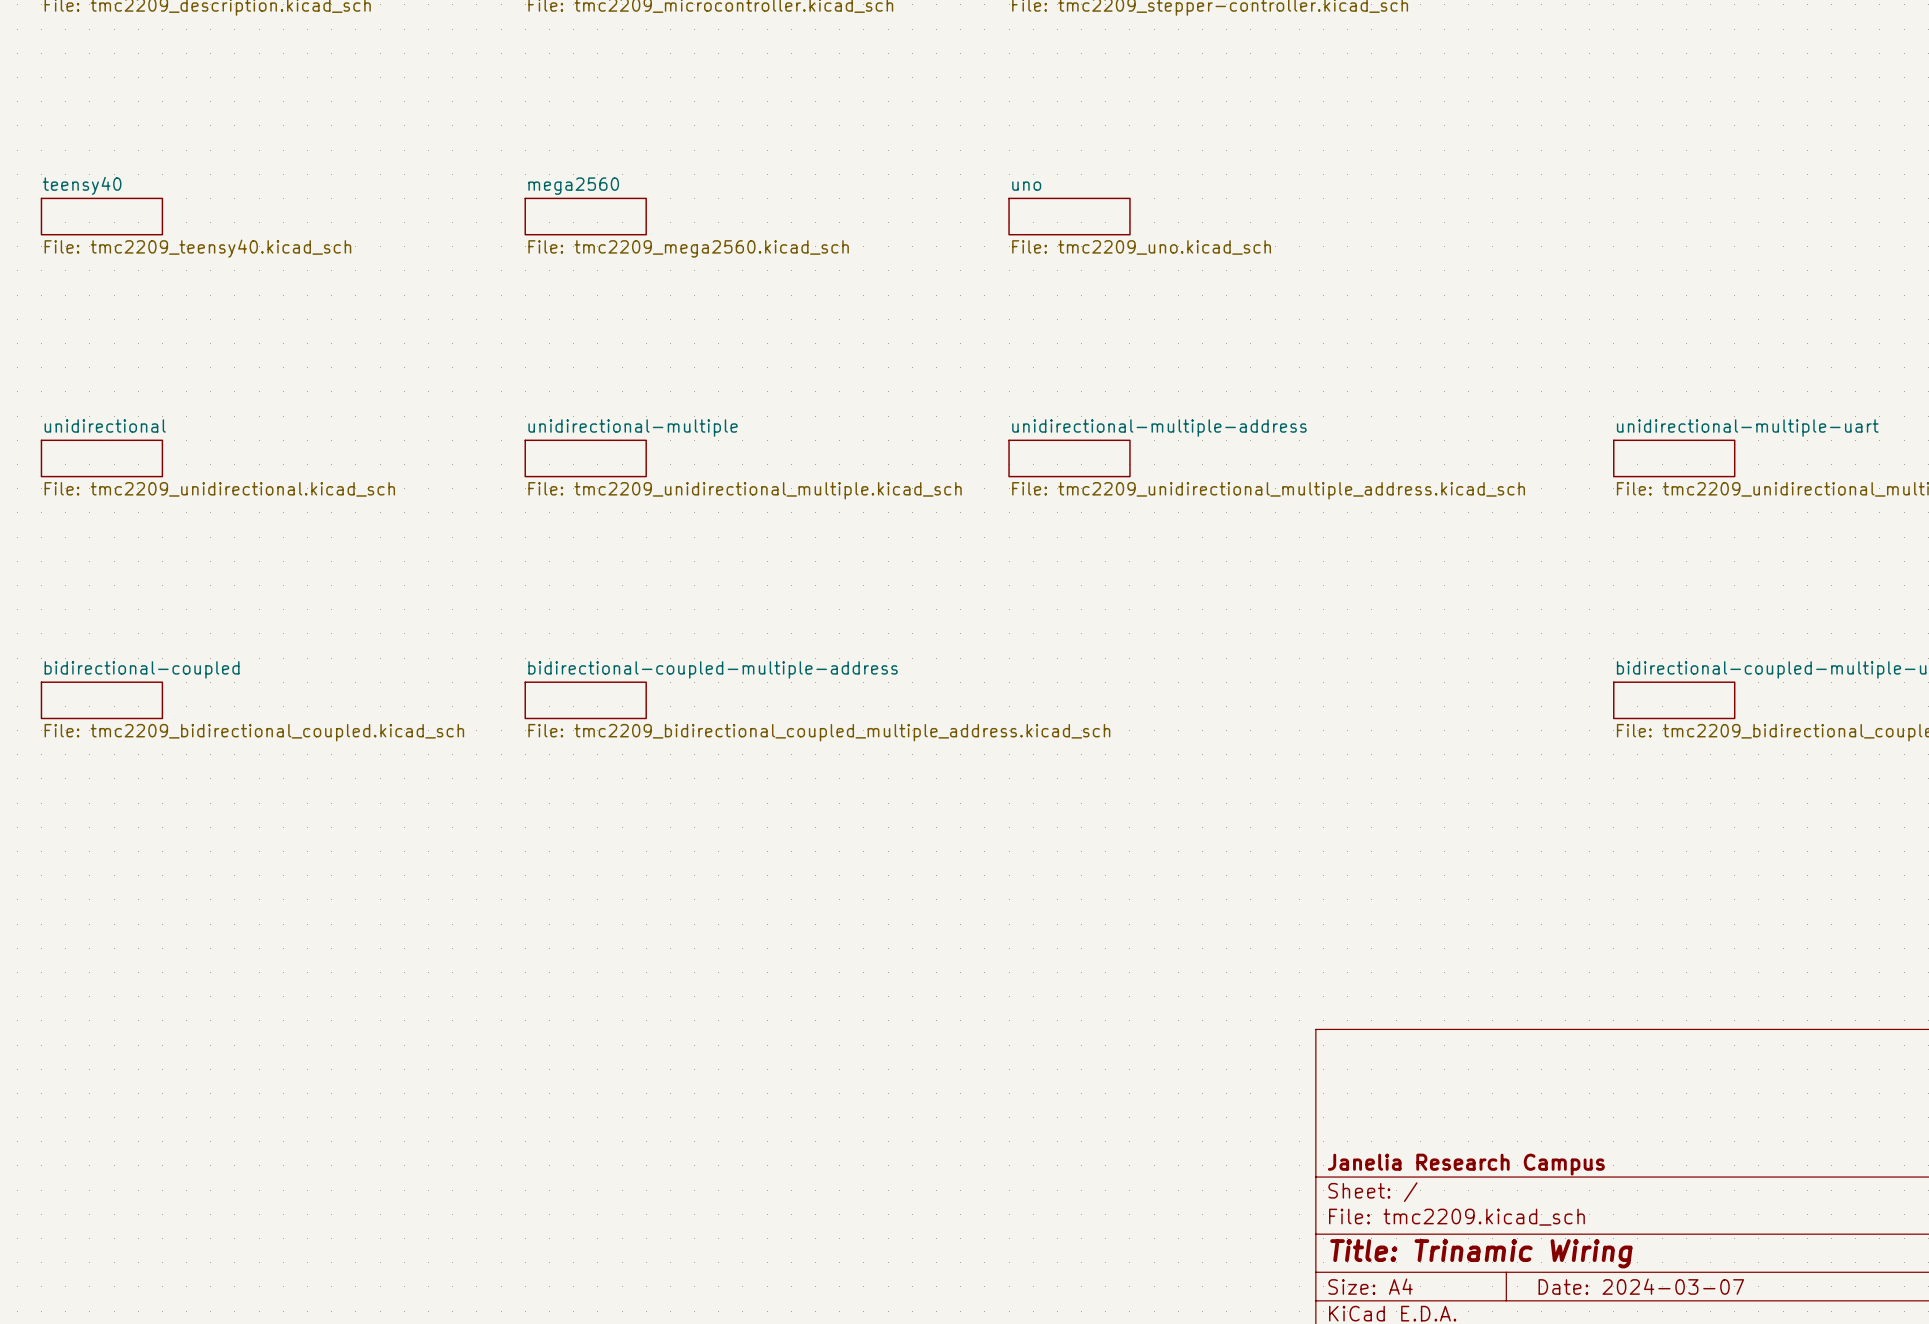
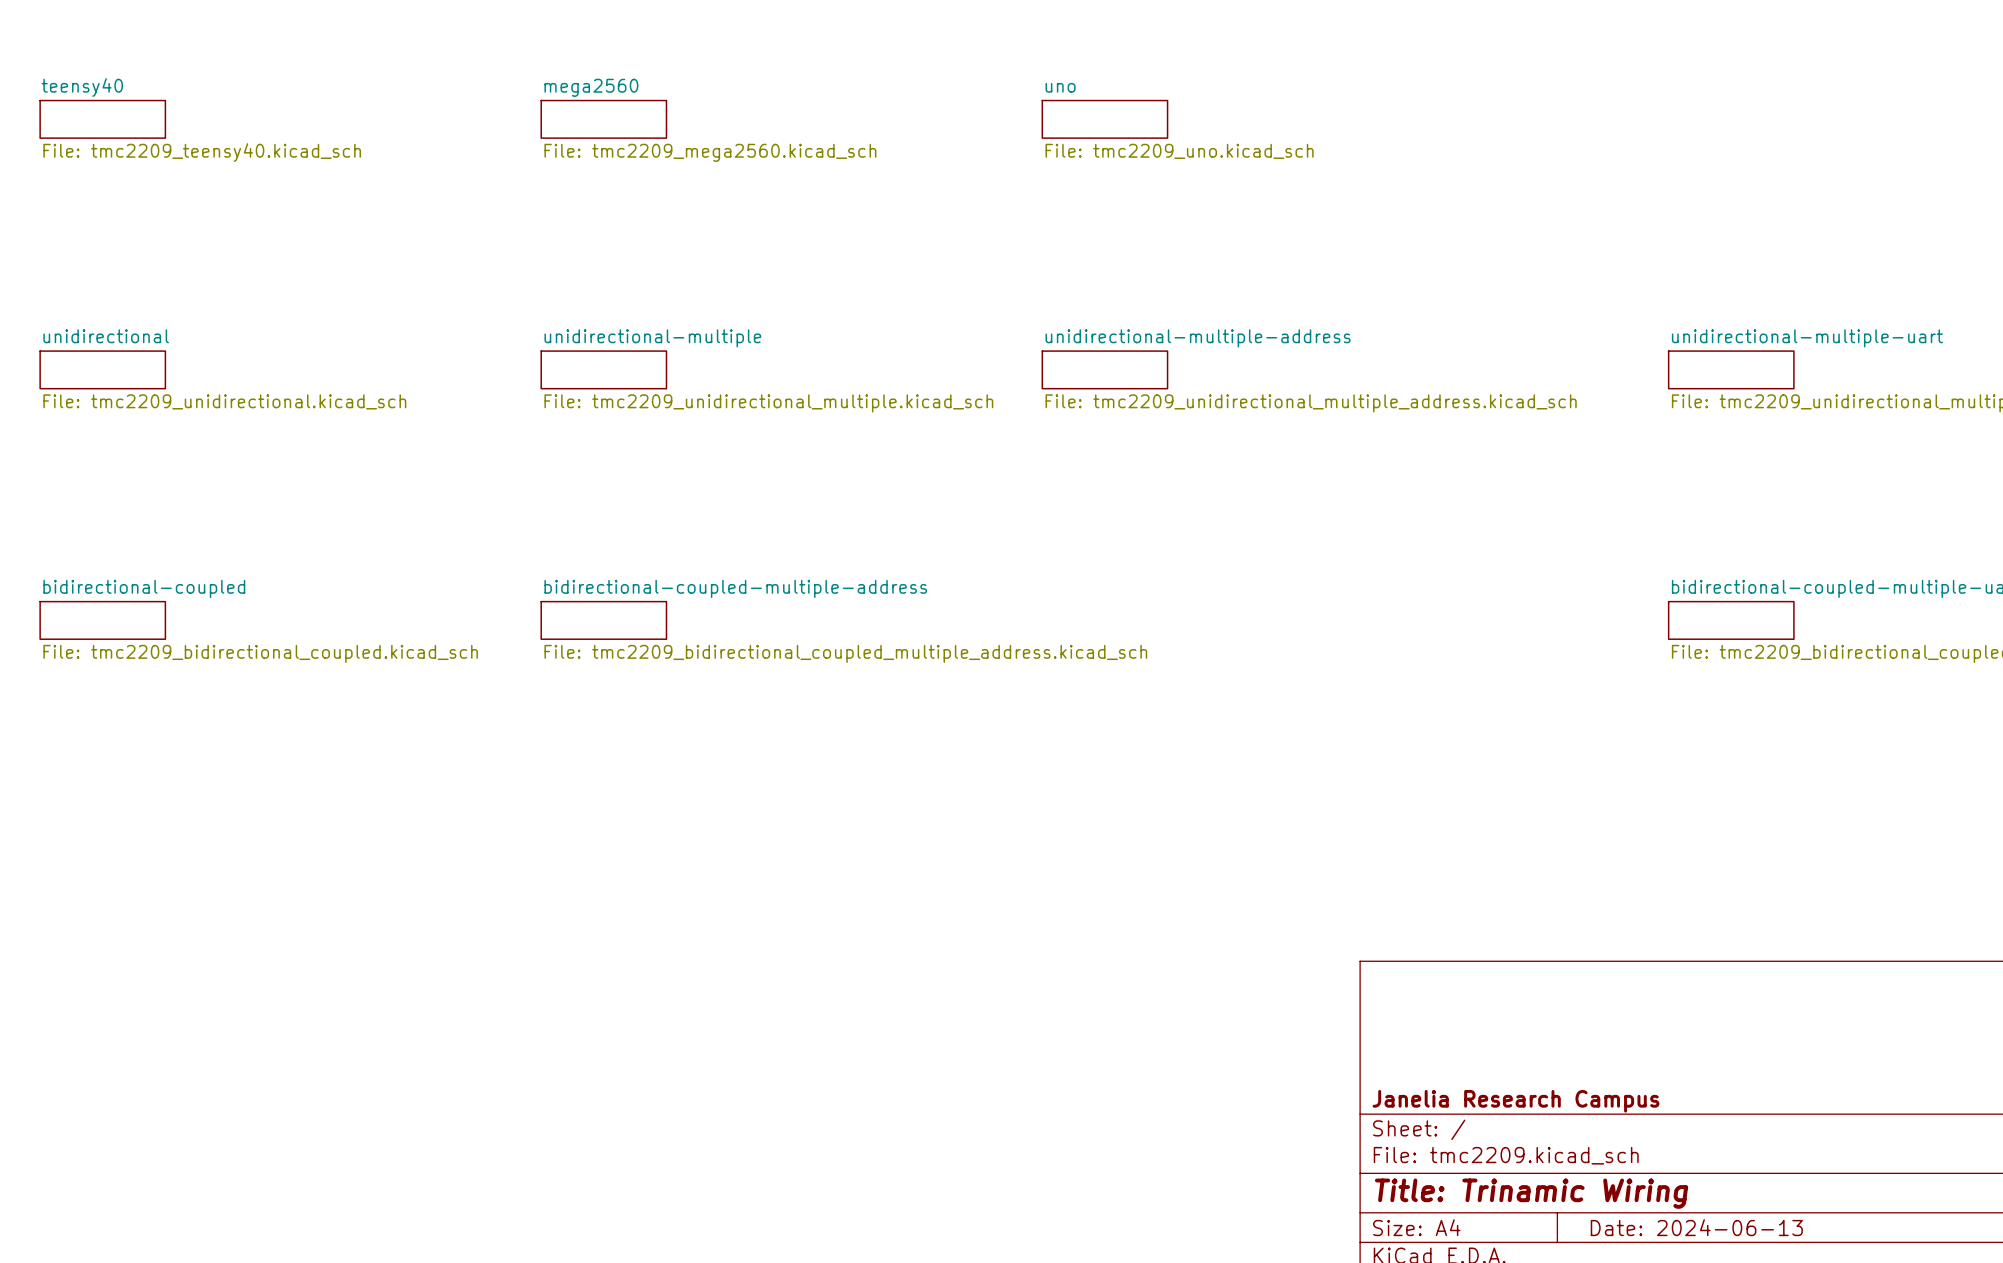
title block: Date: 2024-03-07 (1641, 1286) -> Date: 2024-06-13 (1696, 1227)

